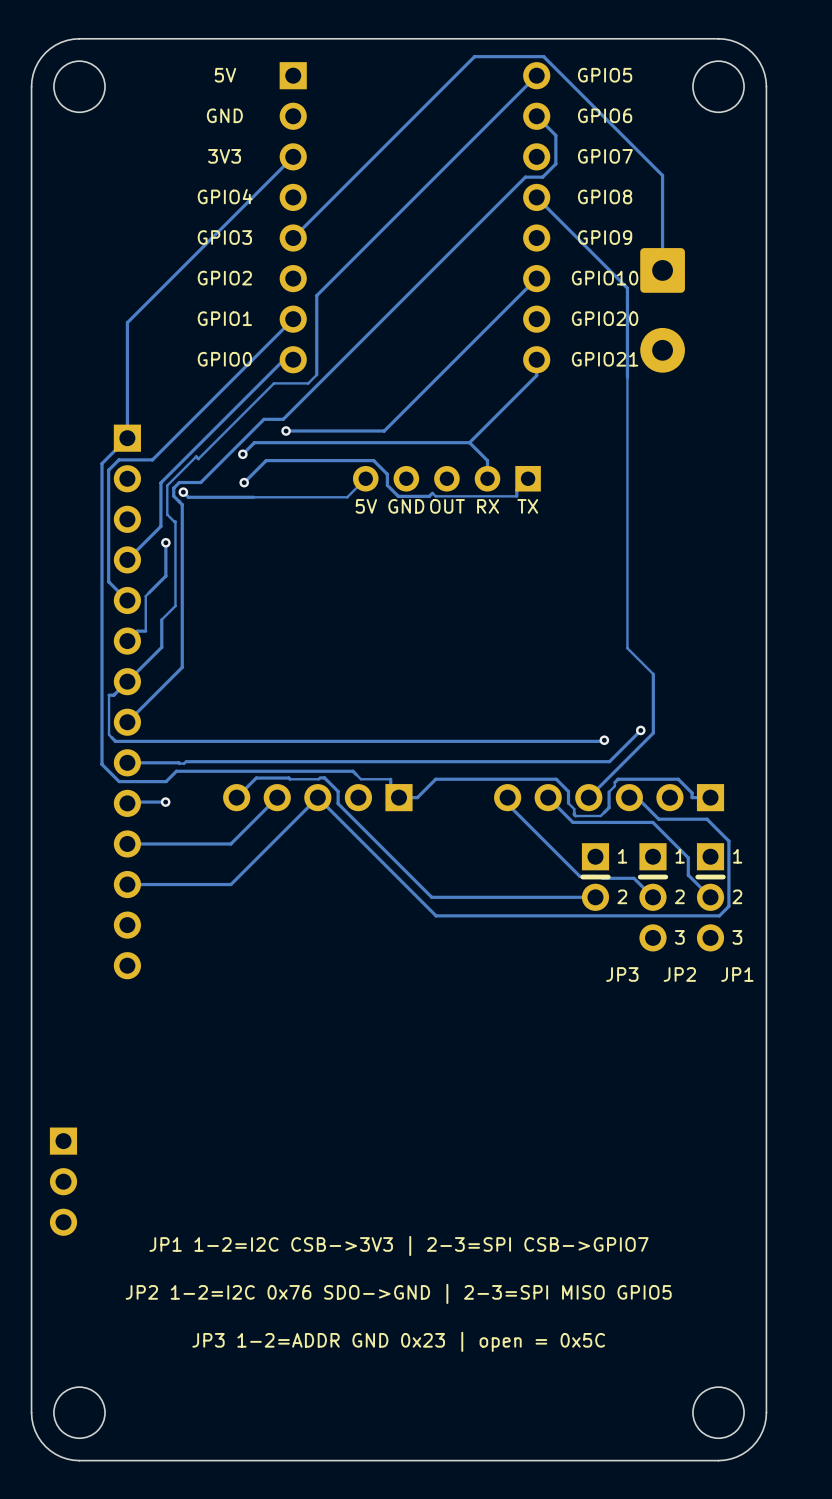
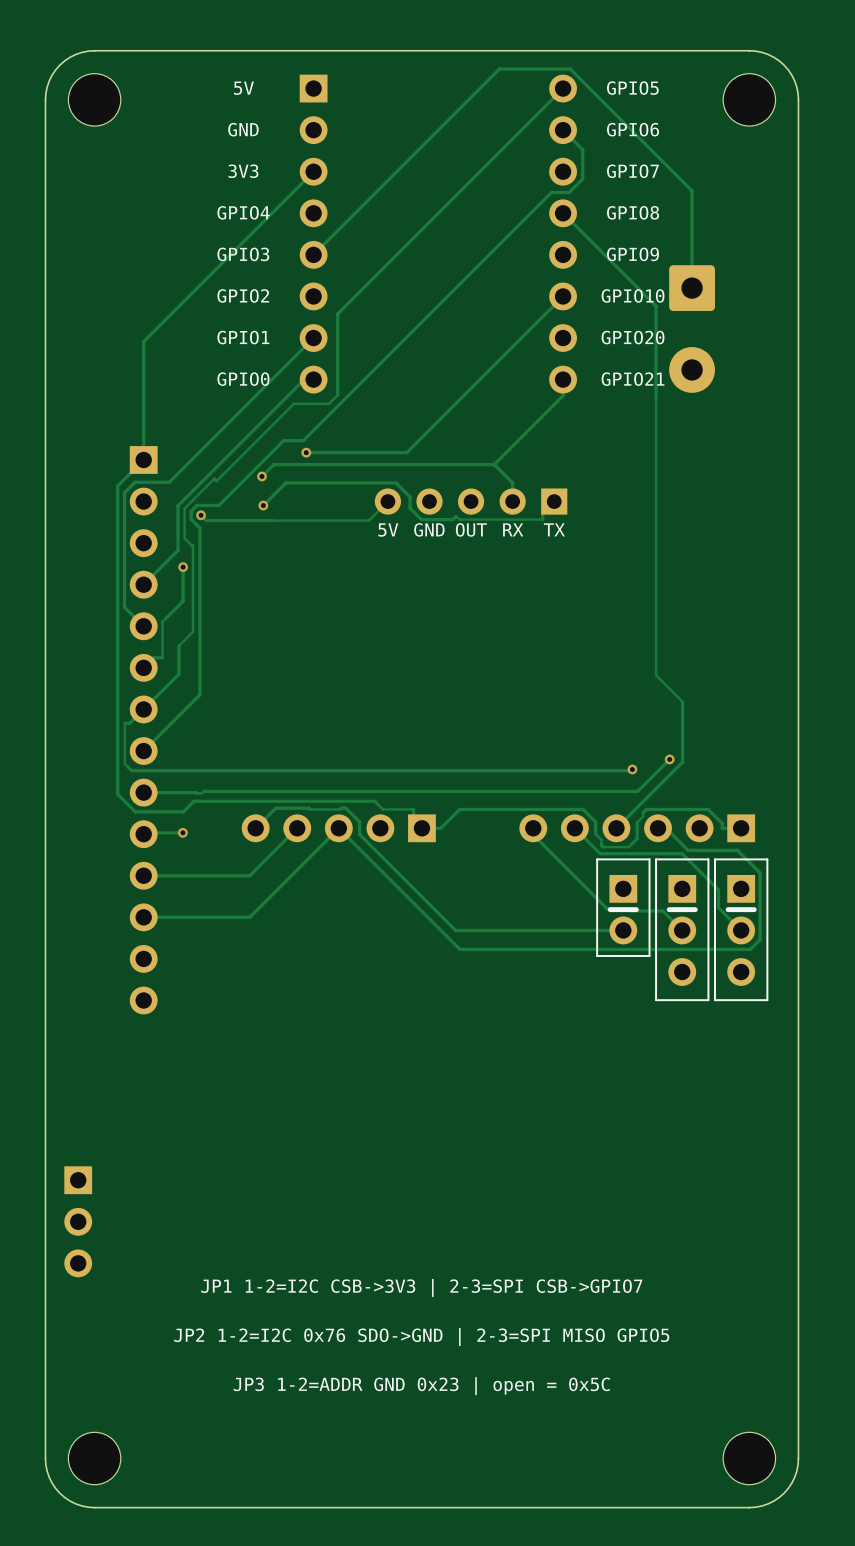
line: none -> (649, 859) (597, 859) (597, 955) (649, 955) (649, 859)
line: none -> (708, 859) (656, 859) (656, 1000) (708, 1000) (708, 859)
line: none -> (767, 859) (714, 859) (714, 1000) (767, 1000) (767, 859)
text: 1 (622, 856) -> none
text: 1 (680, 856) -> none
text: 1 (737, 856) -> none
text: 2 (622, 896) -> none
text: 2 (679, 896) -> none
text: 2 (737, 896) -> none
text: 3 (679, 937) -> none
text: 3 (737, 937) -> none
text: JP3 (622, 974) -> none
text: JP2 (679, 974) -> none
text: JP1 (737, 974) -> none

